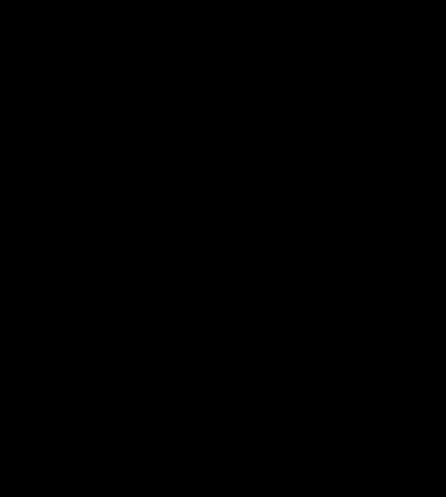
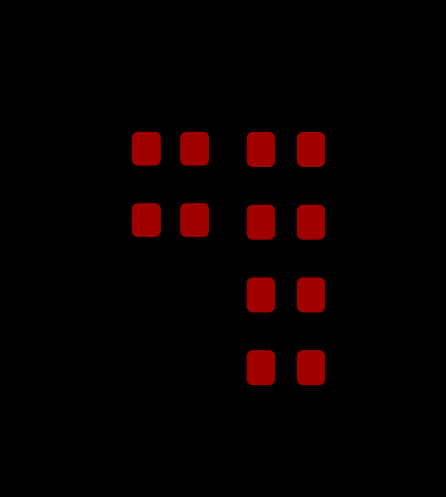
part: none -> (170, 148)
part: none -> (285, 149)
part: none -> (170, 220)
part: none -> (285, 222)
part: none -> (285, 294)
part: none -> (285, 367)

